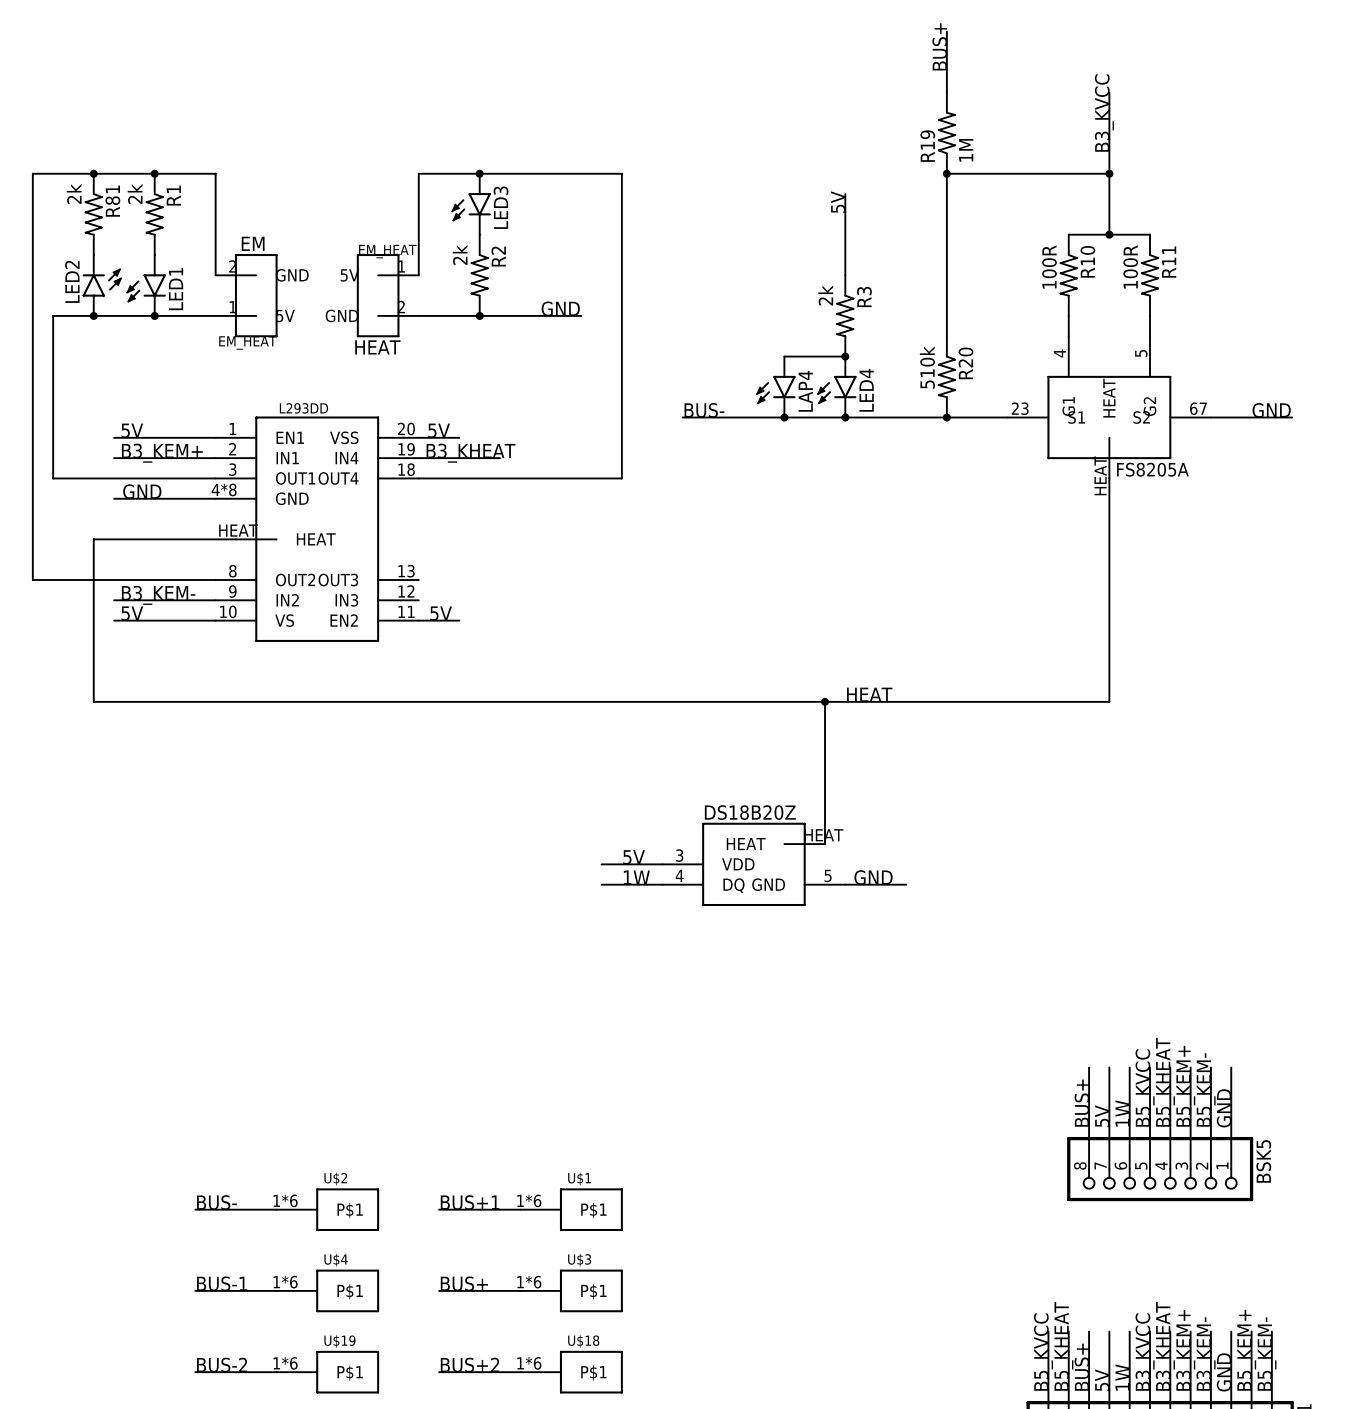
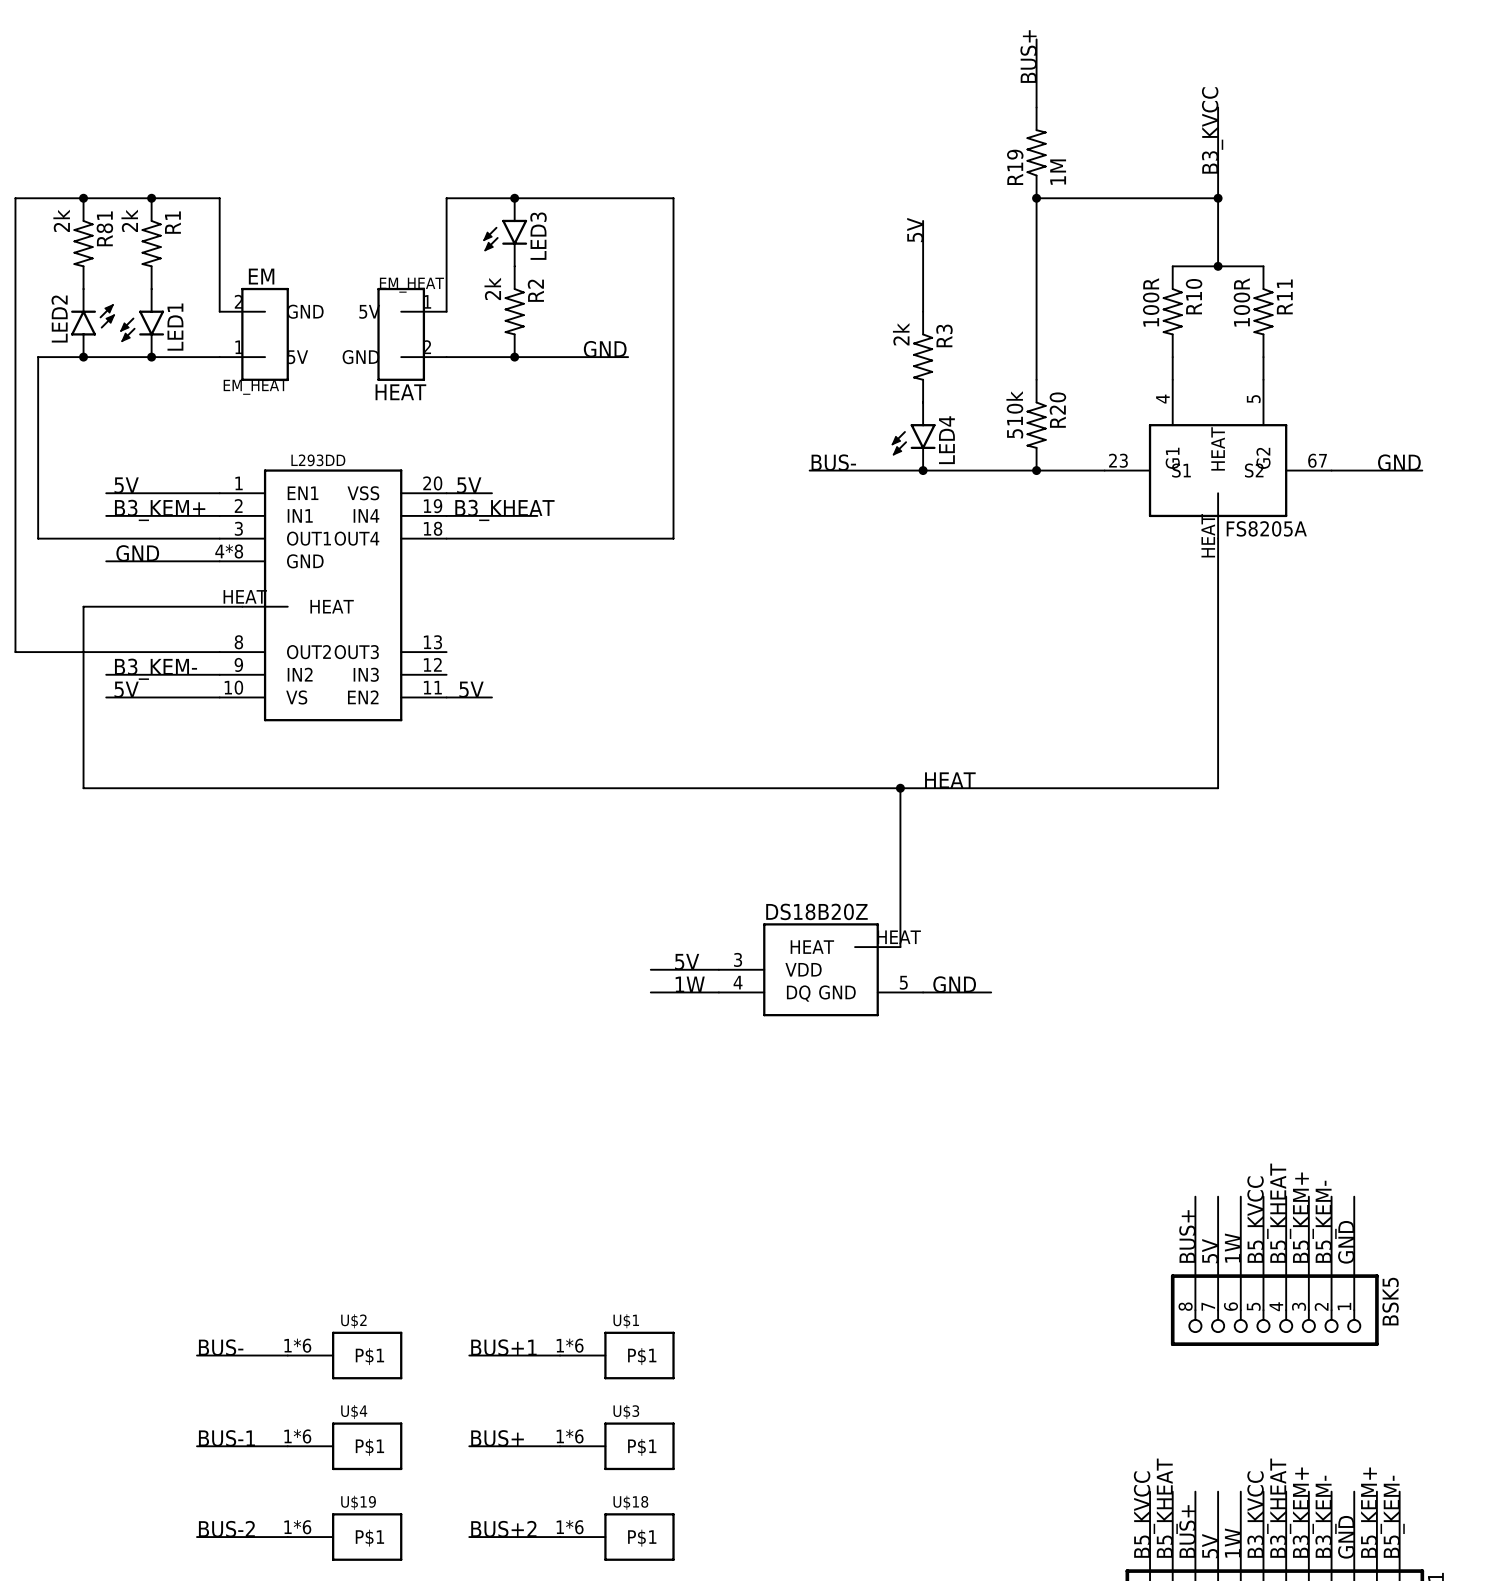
wire: (784, 356) (845, 356) -> none
junction: (845, 356) -> none
LAP4: (775, 387) -> none
label position: BUS- (704, 410) -> BUS- (833, 462)
wire: (682, 417) (743, 417) -> none
junction: (784, 417) -> none

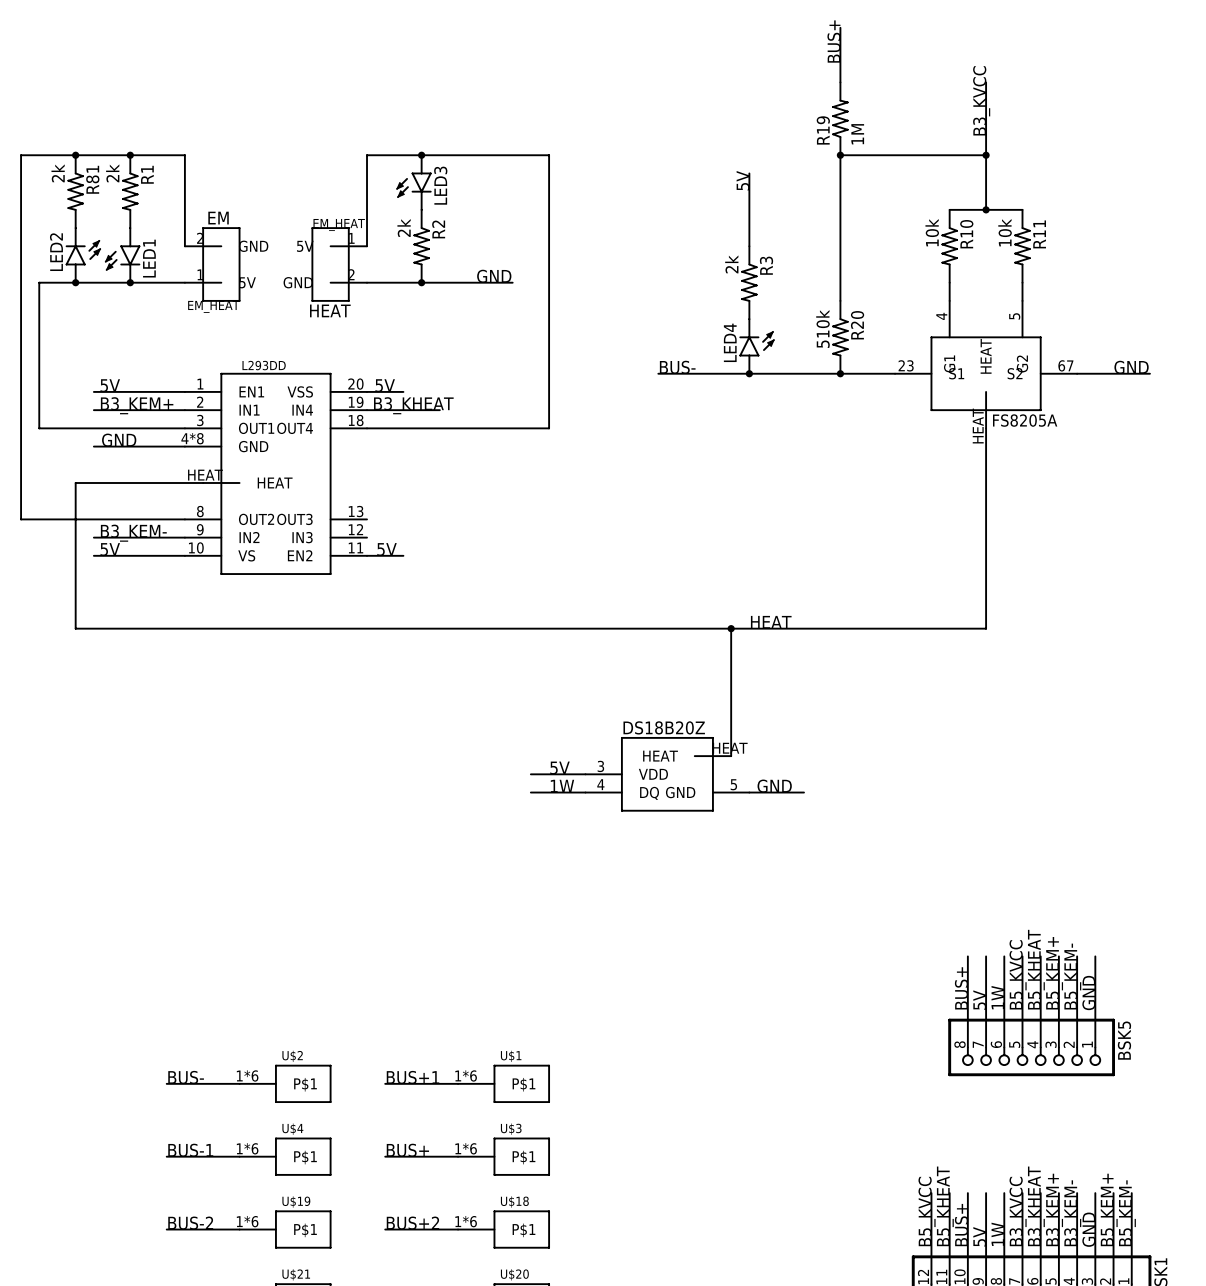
R10 value: 100R (1151, 302) -> 10k (932, 232)
R11 value: 100R (1241, 302) -> 10k (1005, 232)
LED4 rotation: 0° (913, 439) -> 180° (756, 343)

